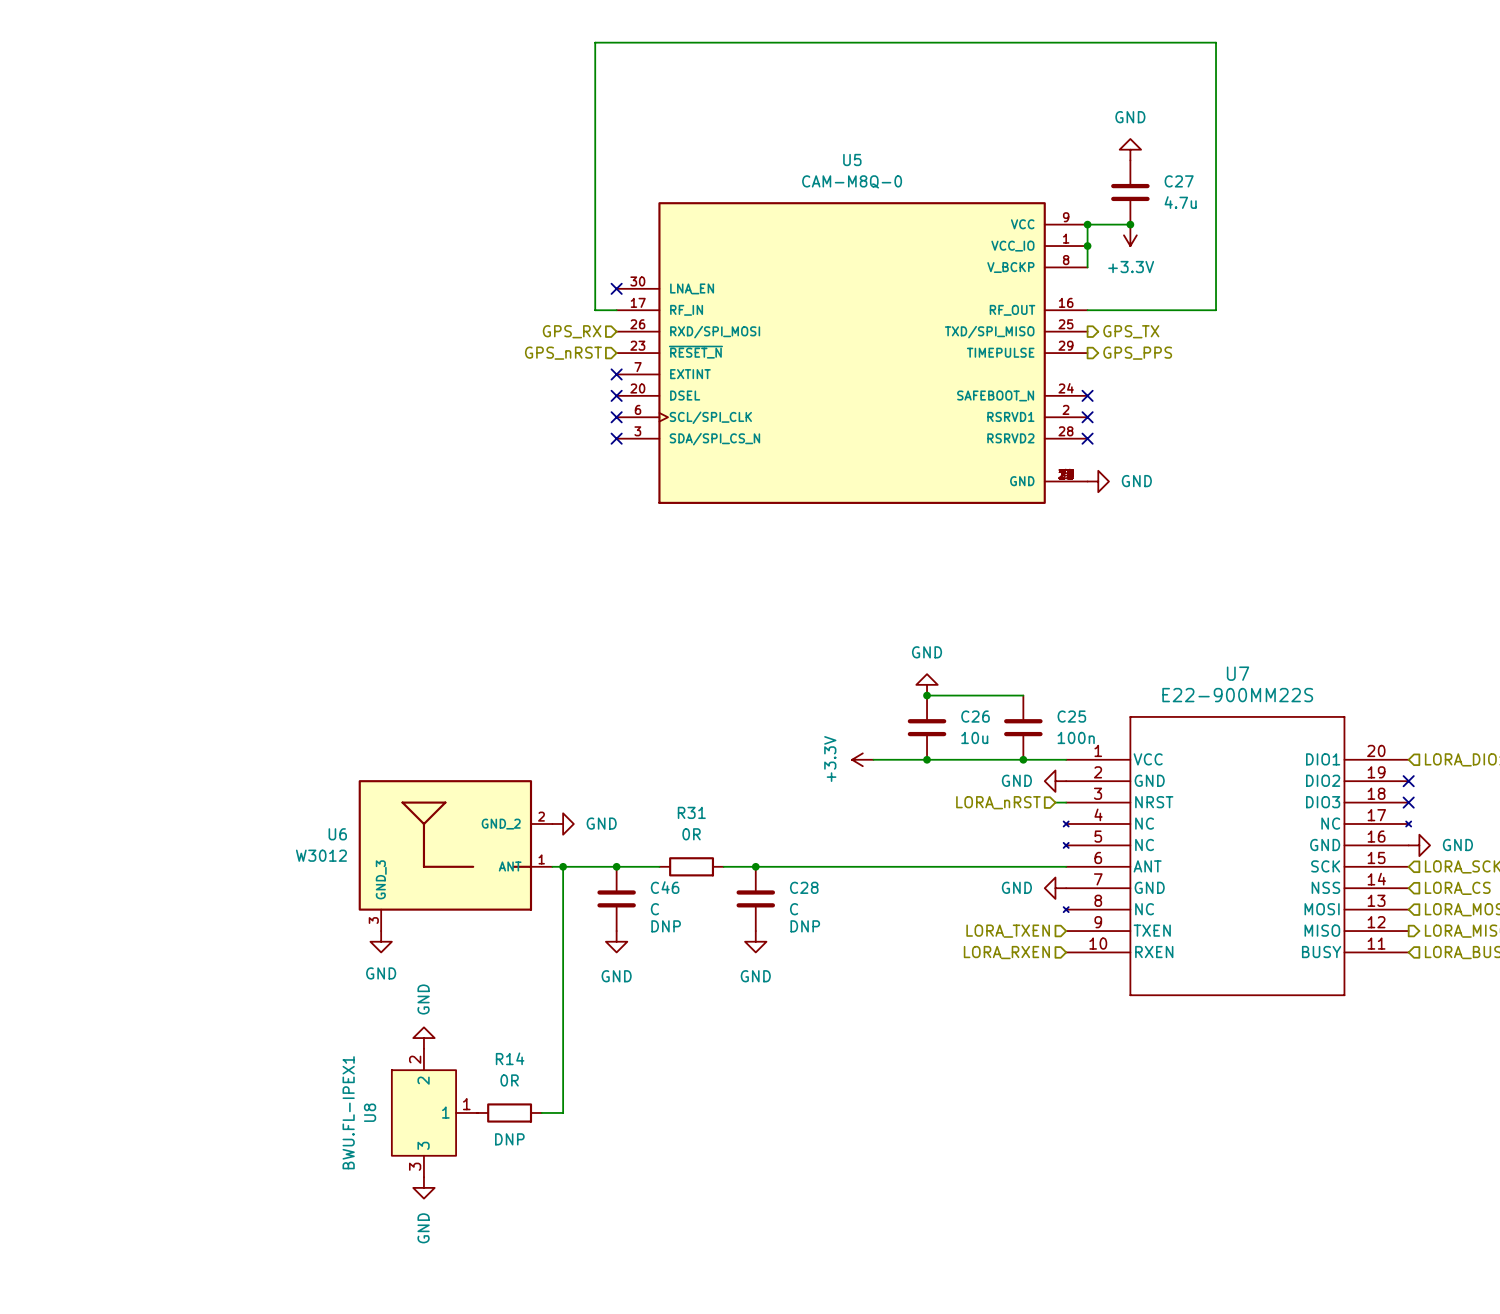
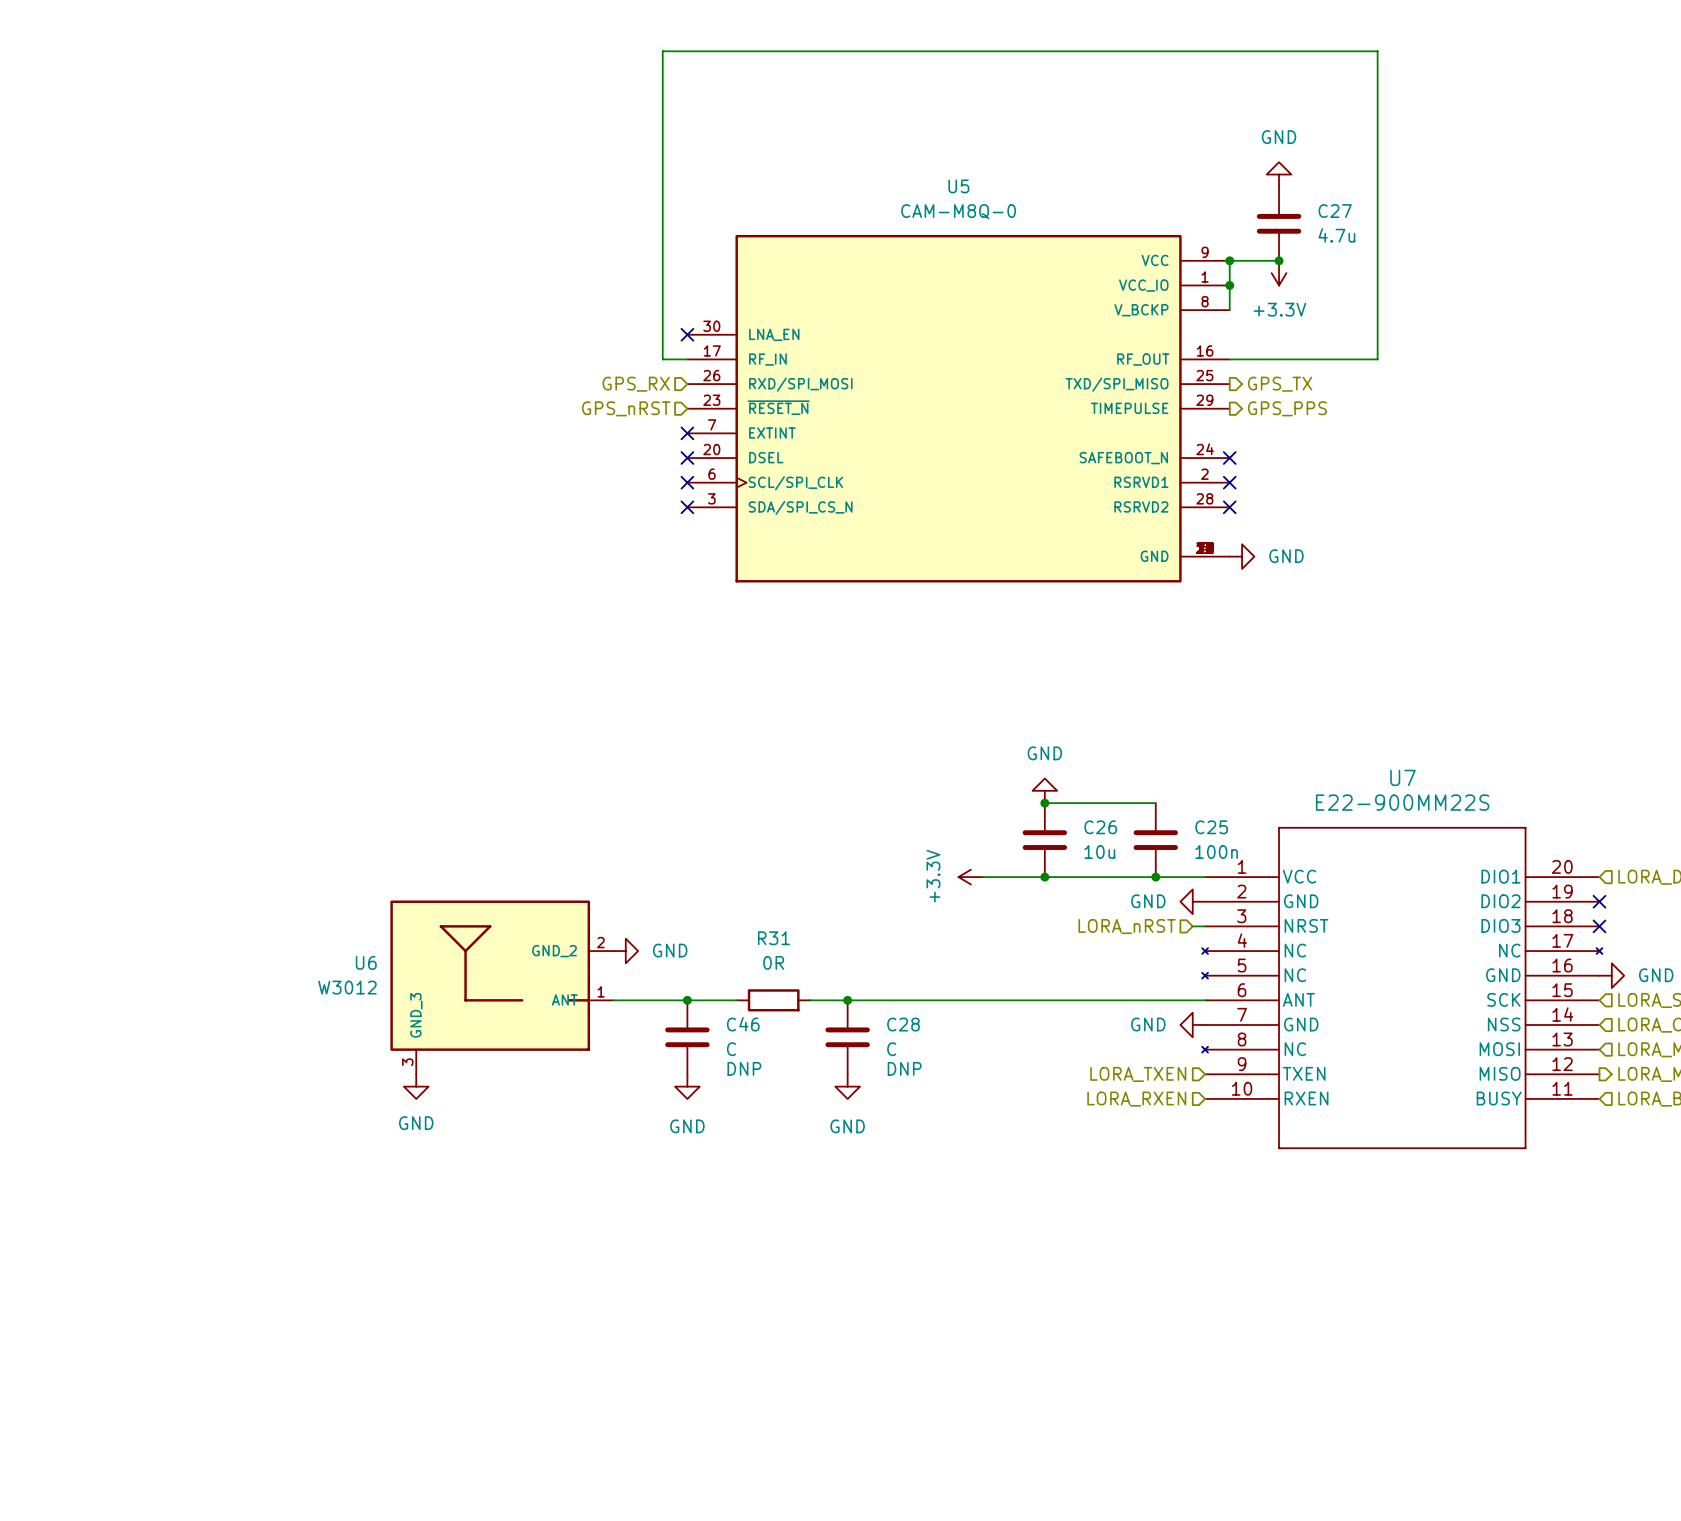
wire: (563, 866) (563, 1112) (541, 1112) -> none
junction: (563, 866) -> none
power symbol: GND (423, 1038) -> none
U8: BWU.FL-IPEX1 (434, 1112) -> none
R14: 0R (509, 1112) -> none
power symbol: GND (423, 1187) -> none

